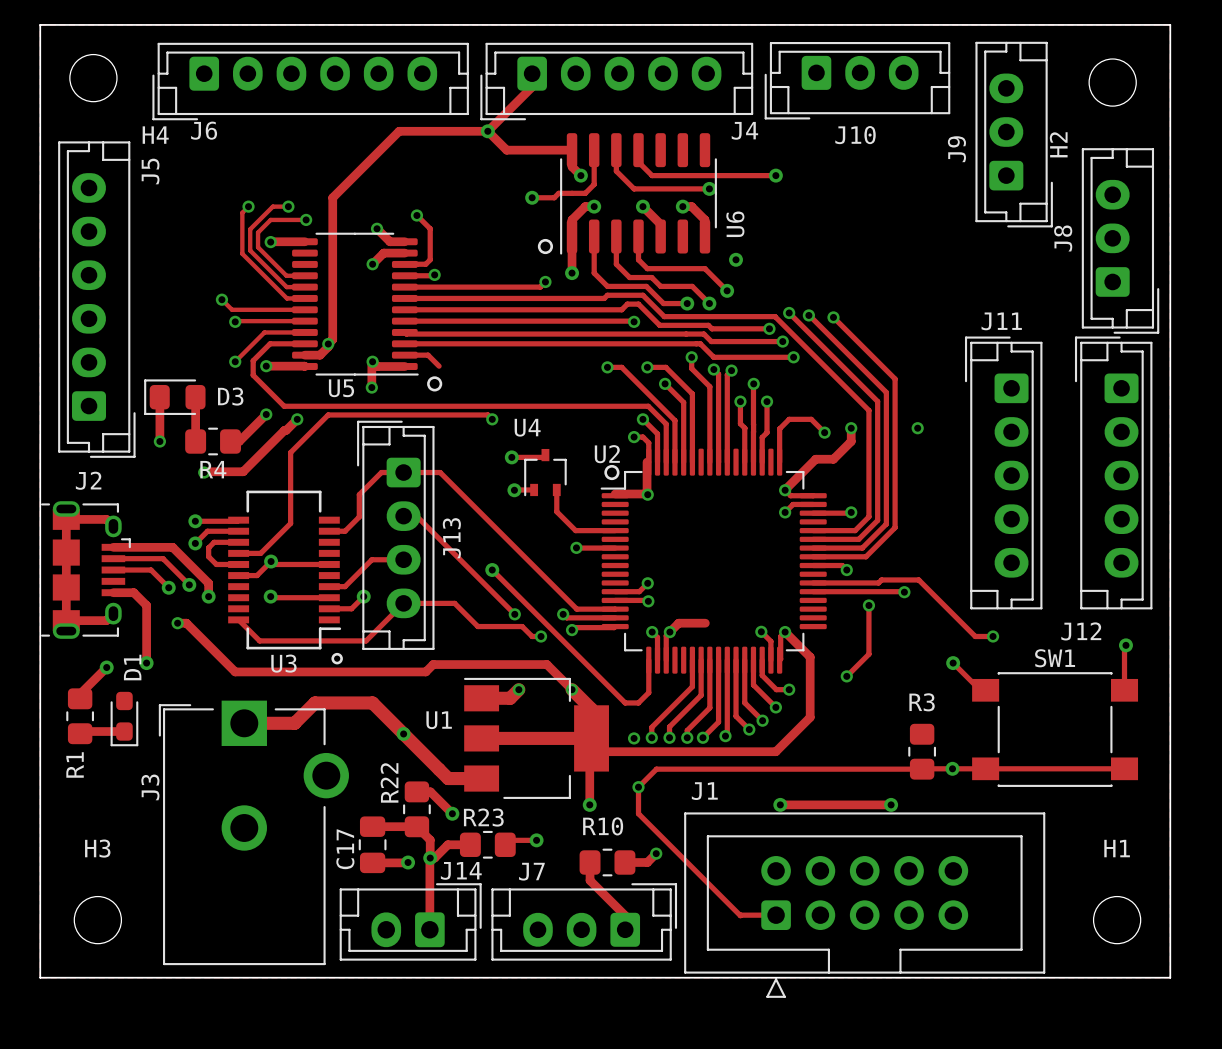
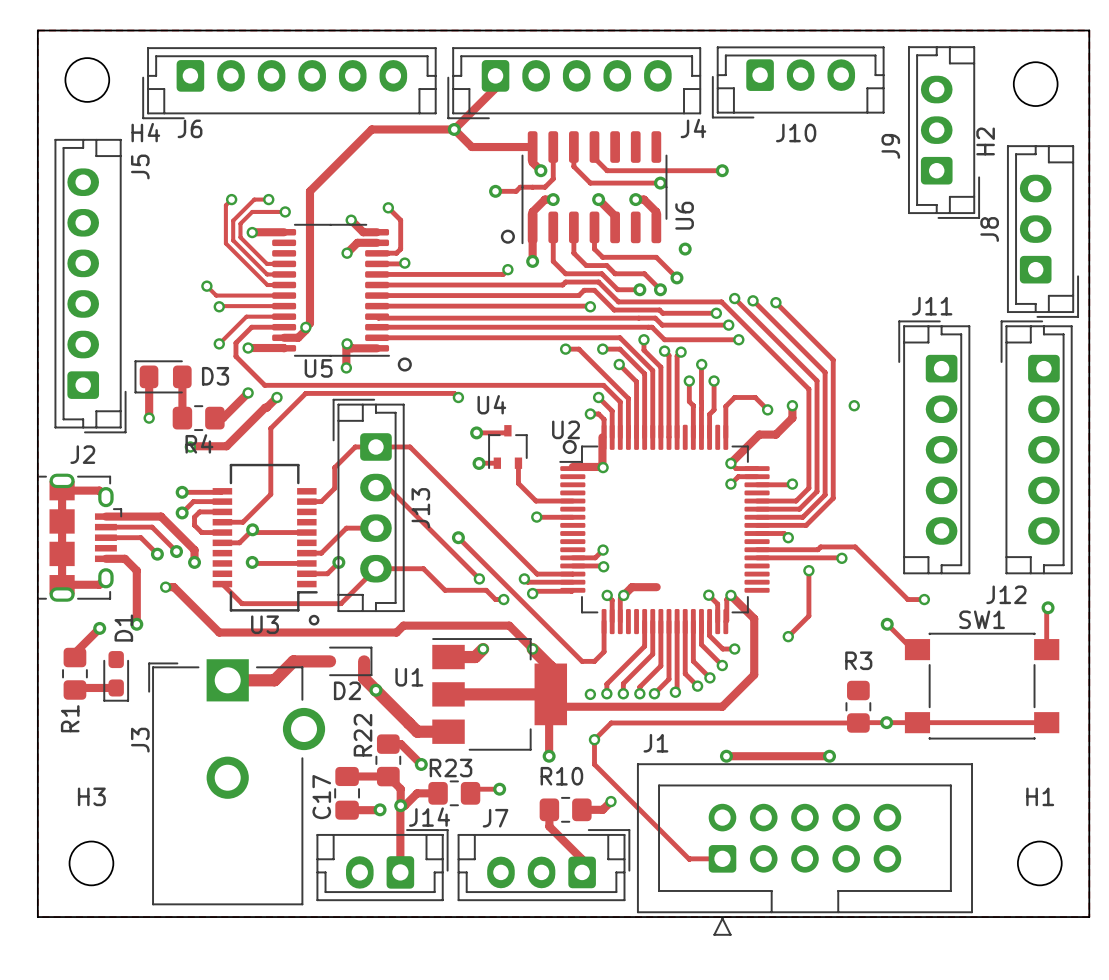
track: (428, 355) (439, 366) -> (398, 337) (620, 337) (652, 370) (652, 437)
track: (354, 702) (372, 702) (390, 721) -> (364, 661) (364, 678)
D2: none -> (348, 661)

